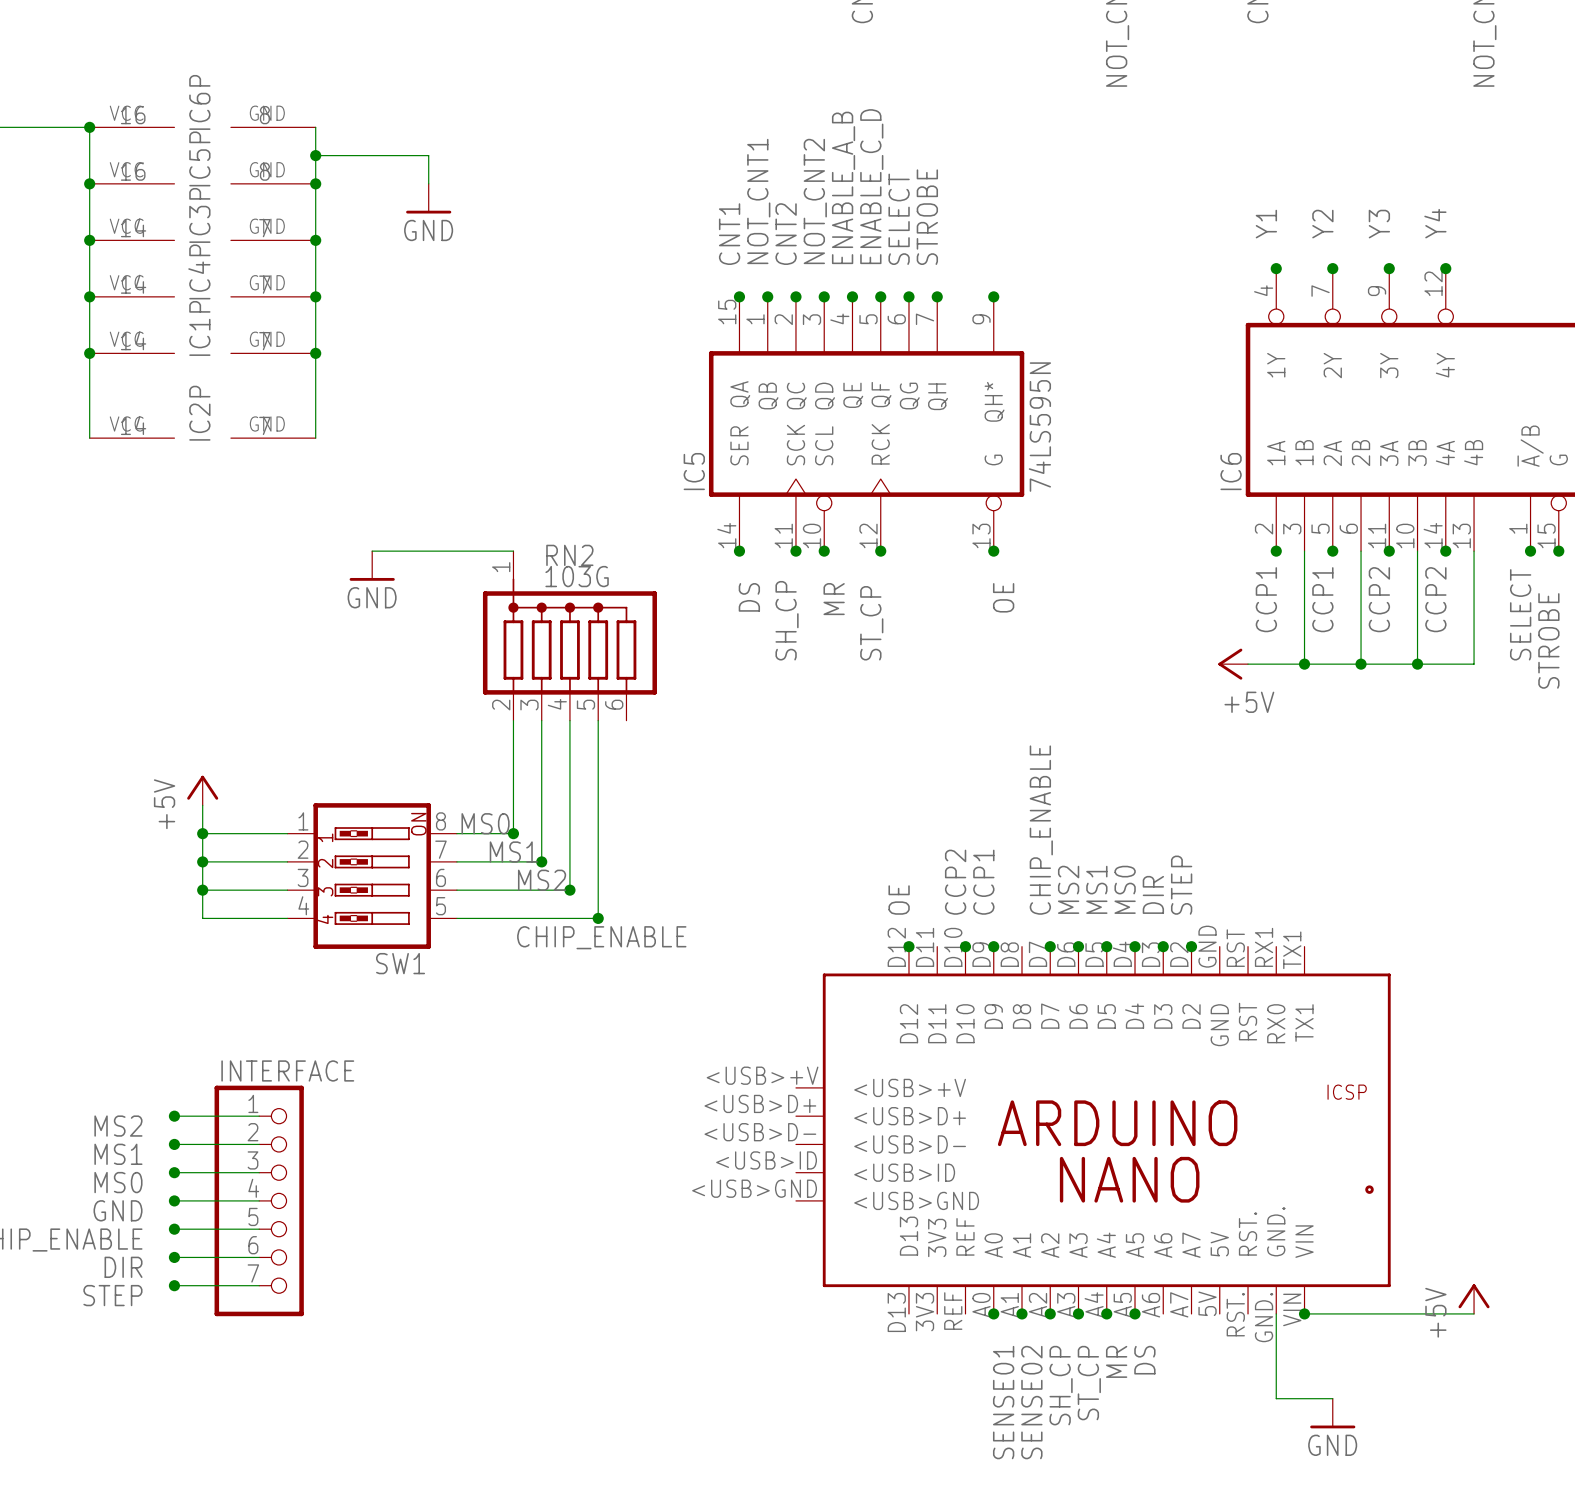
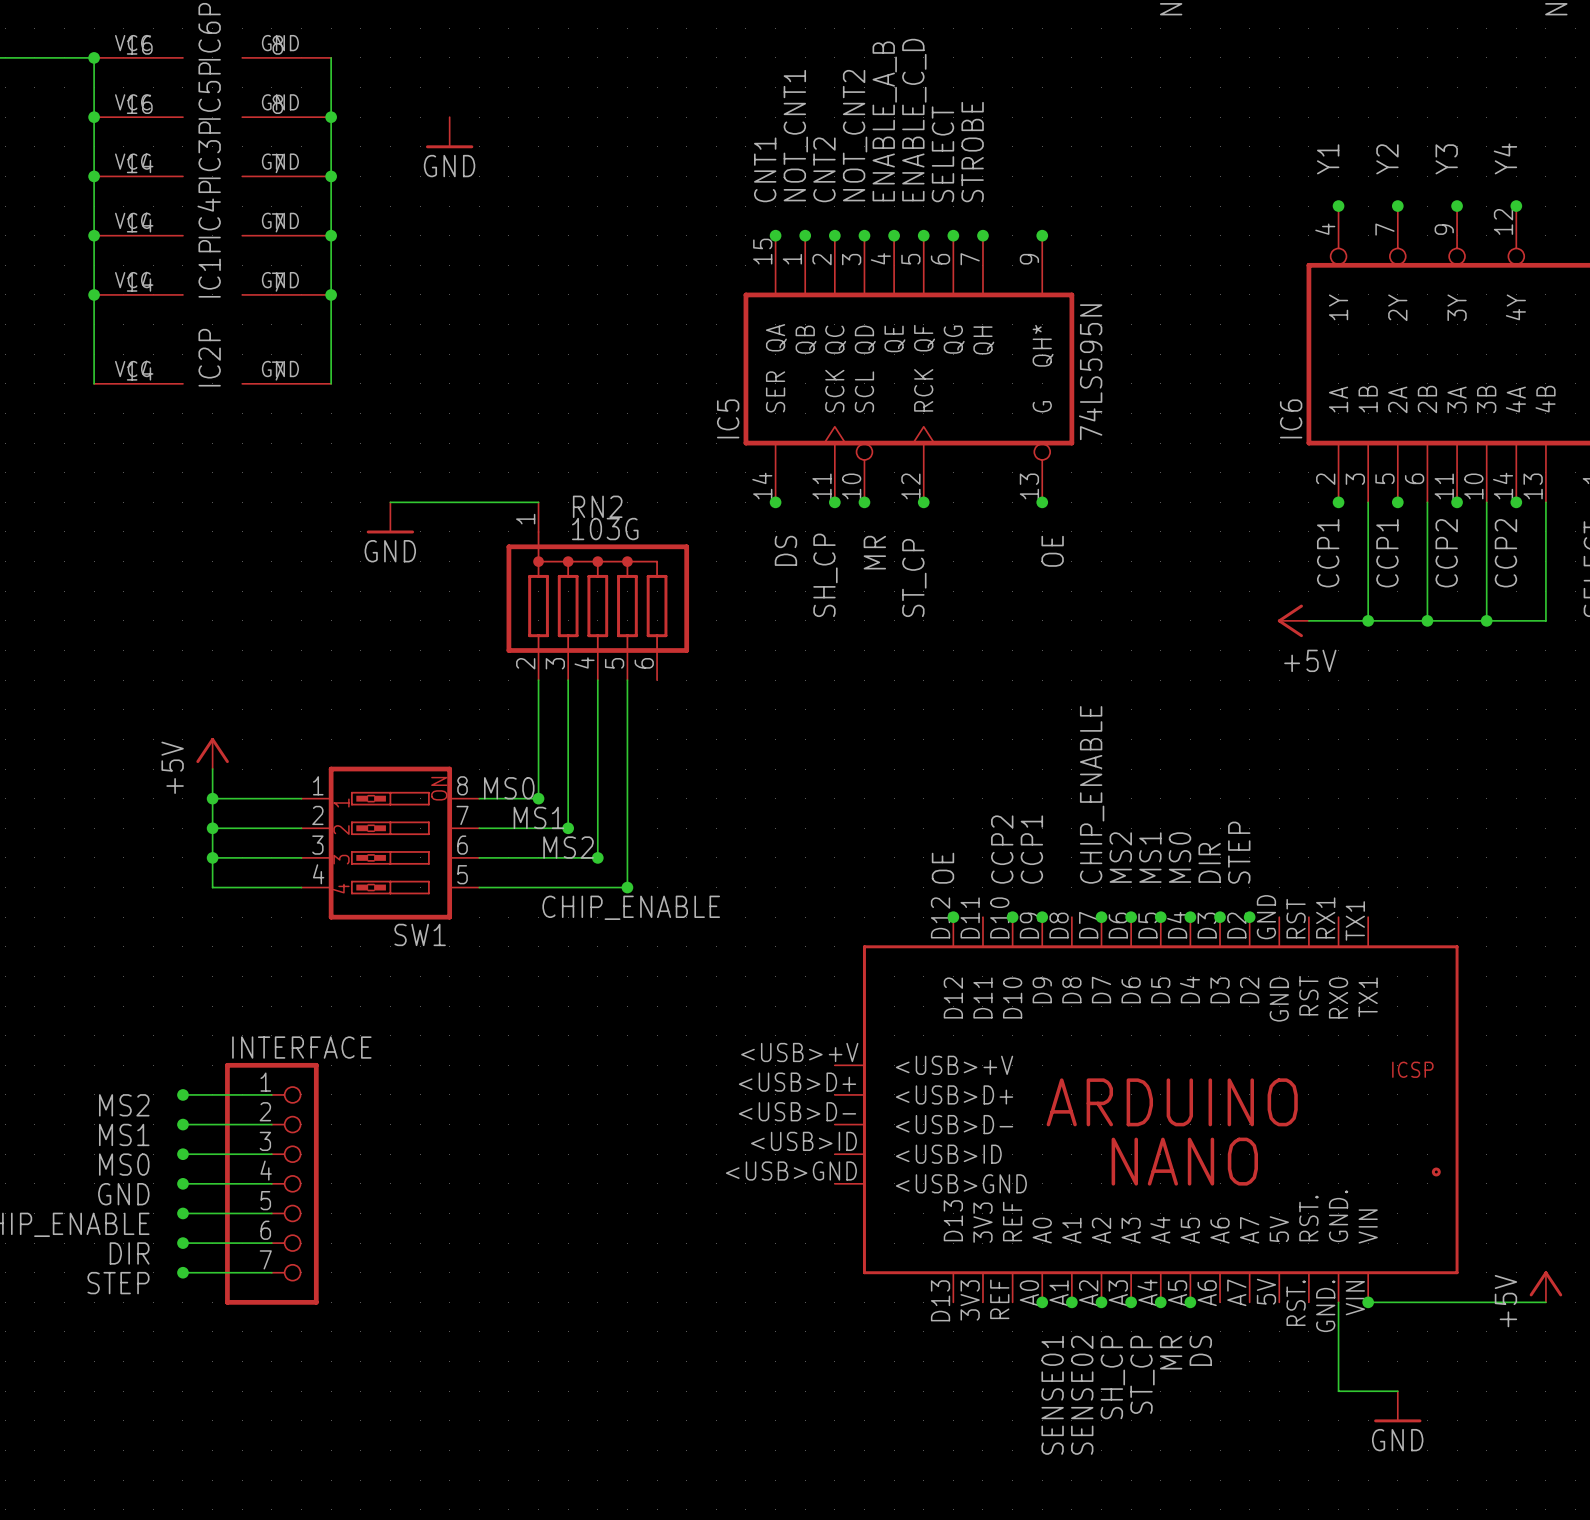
wire: (315, 155) (428, 155) (428, 183) -> none
junction: (315, 155) -> none

